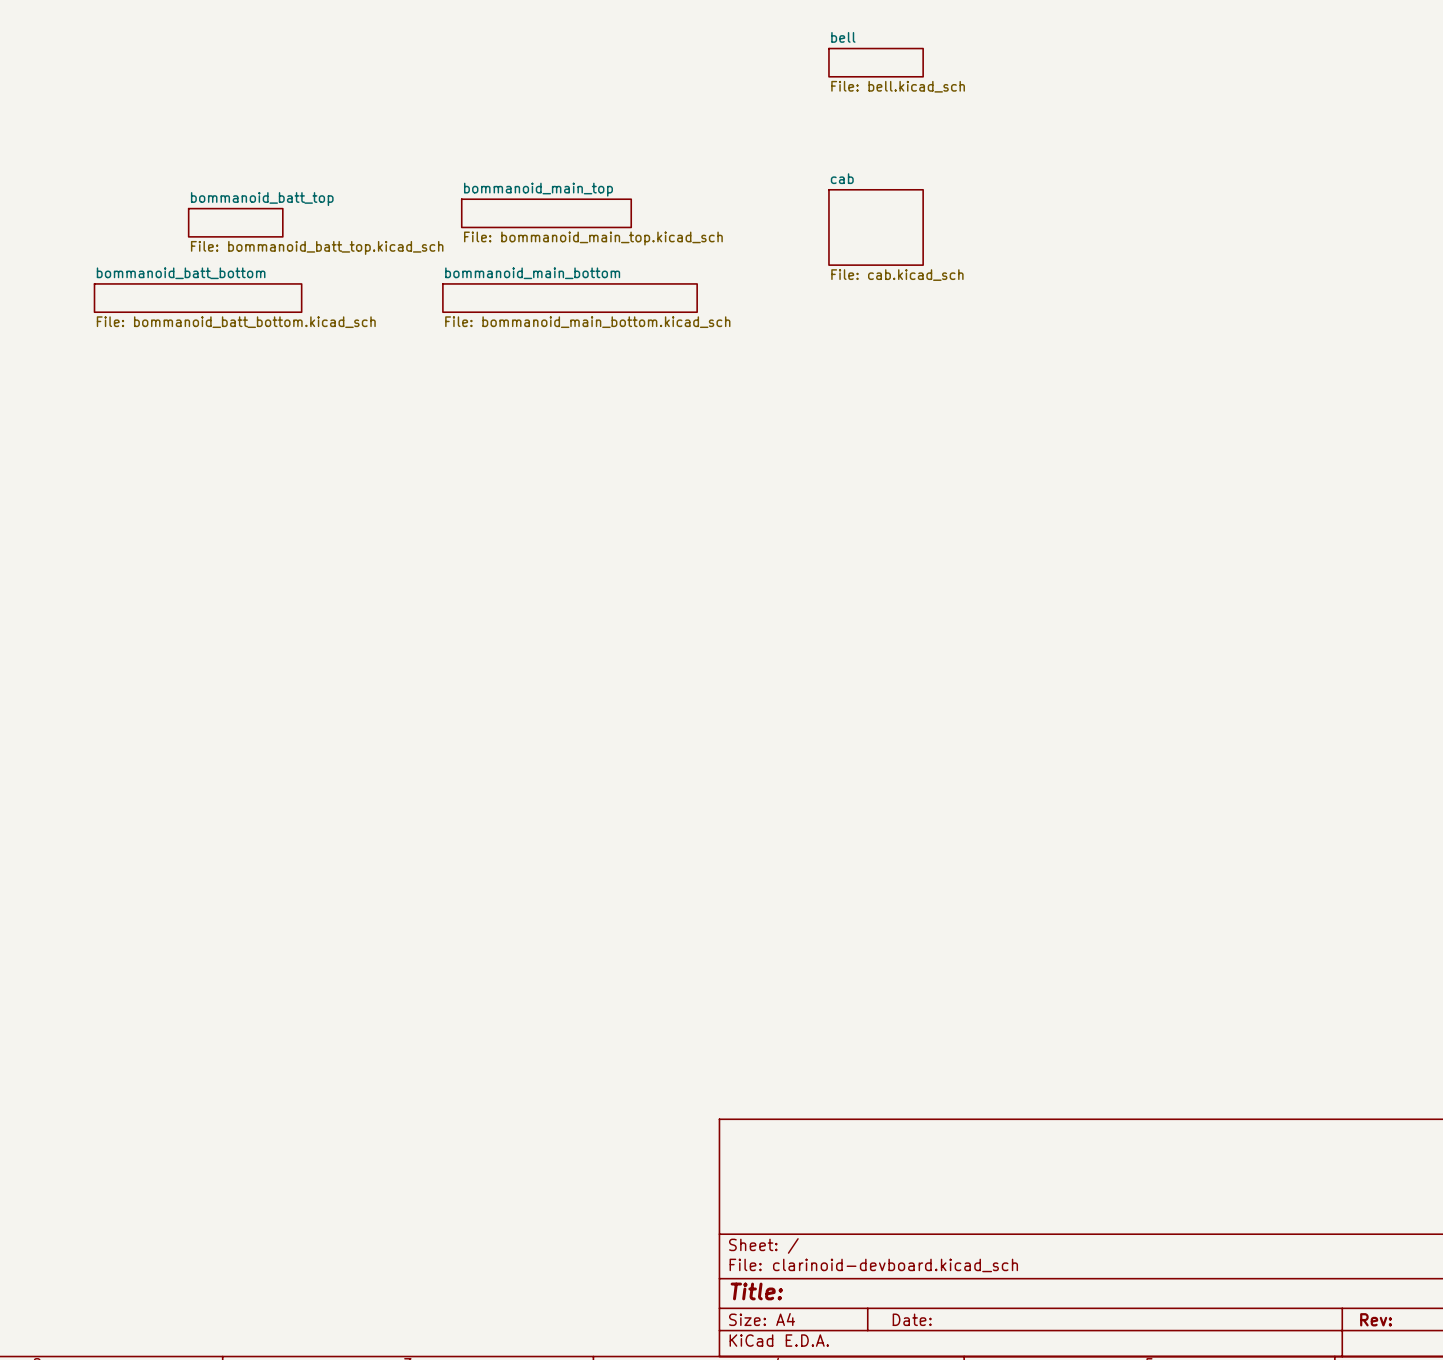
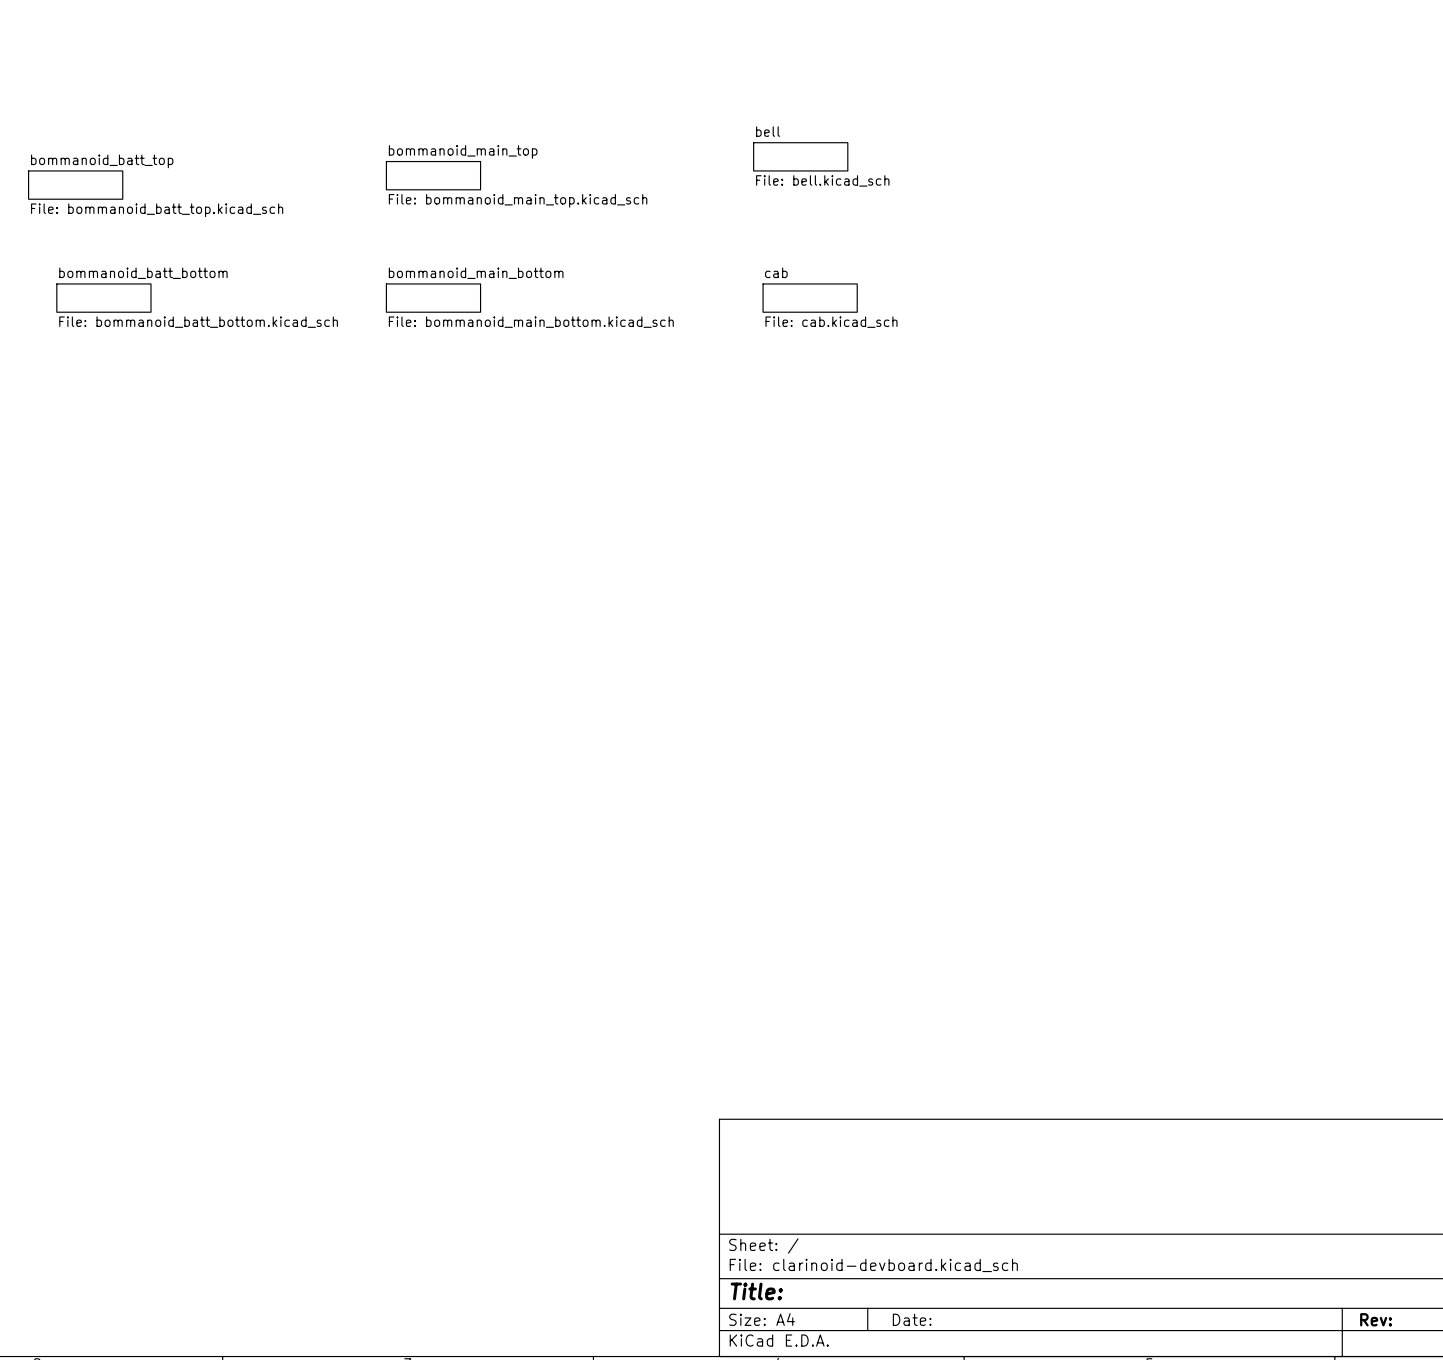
sheet bell position: (876, 62) -> (800, 156)
sheet bommanoid_main_top: none -> File: bommanoid_main_top.kicad_sch (433, 175)
sheet bommanoid_main_top: File: bommanoid_main_top.kicad_sch (546, 213) -> none
sheet bommanoid_batt_top position: (235, 222) -> (75, 185)
sheet cab: File: cab.kicad_sch (876, 227) -> none
sheet bommanoid_batt_bottom: none -> File: bommanoid_batt_bottom.kicad_sch (103, 298)
sheet bommanoid_batt_bottom: File: bommanoid_batt_bottom.kicad_sch (198, 298) -> none
sheet bommanoid_main_bottom: none -> File: bommanoid_main_bottom.kicad_sch (433, 298)
sheet bommanoid_main_bottom: File: bommanoid_main_bottom.kicad_sch (570, 298) -> none
sheet cab: none -> File: cab.kicad_sch (810, 298)

